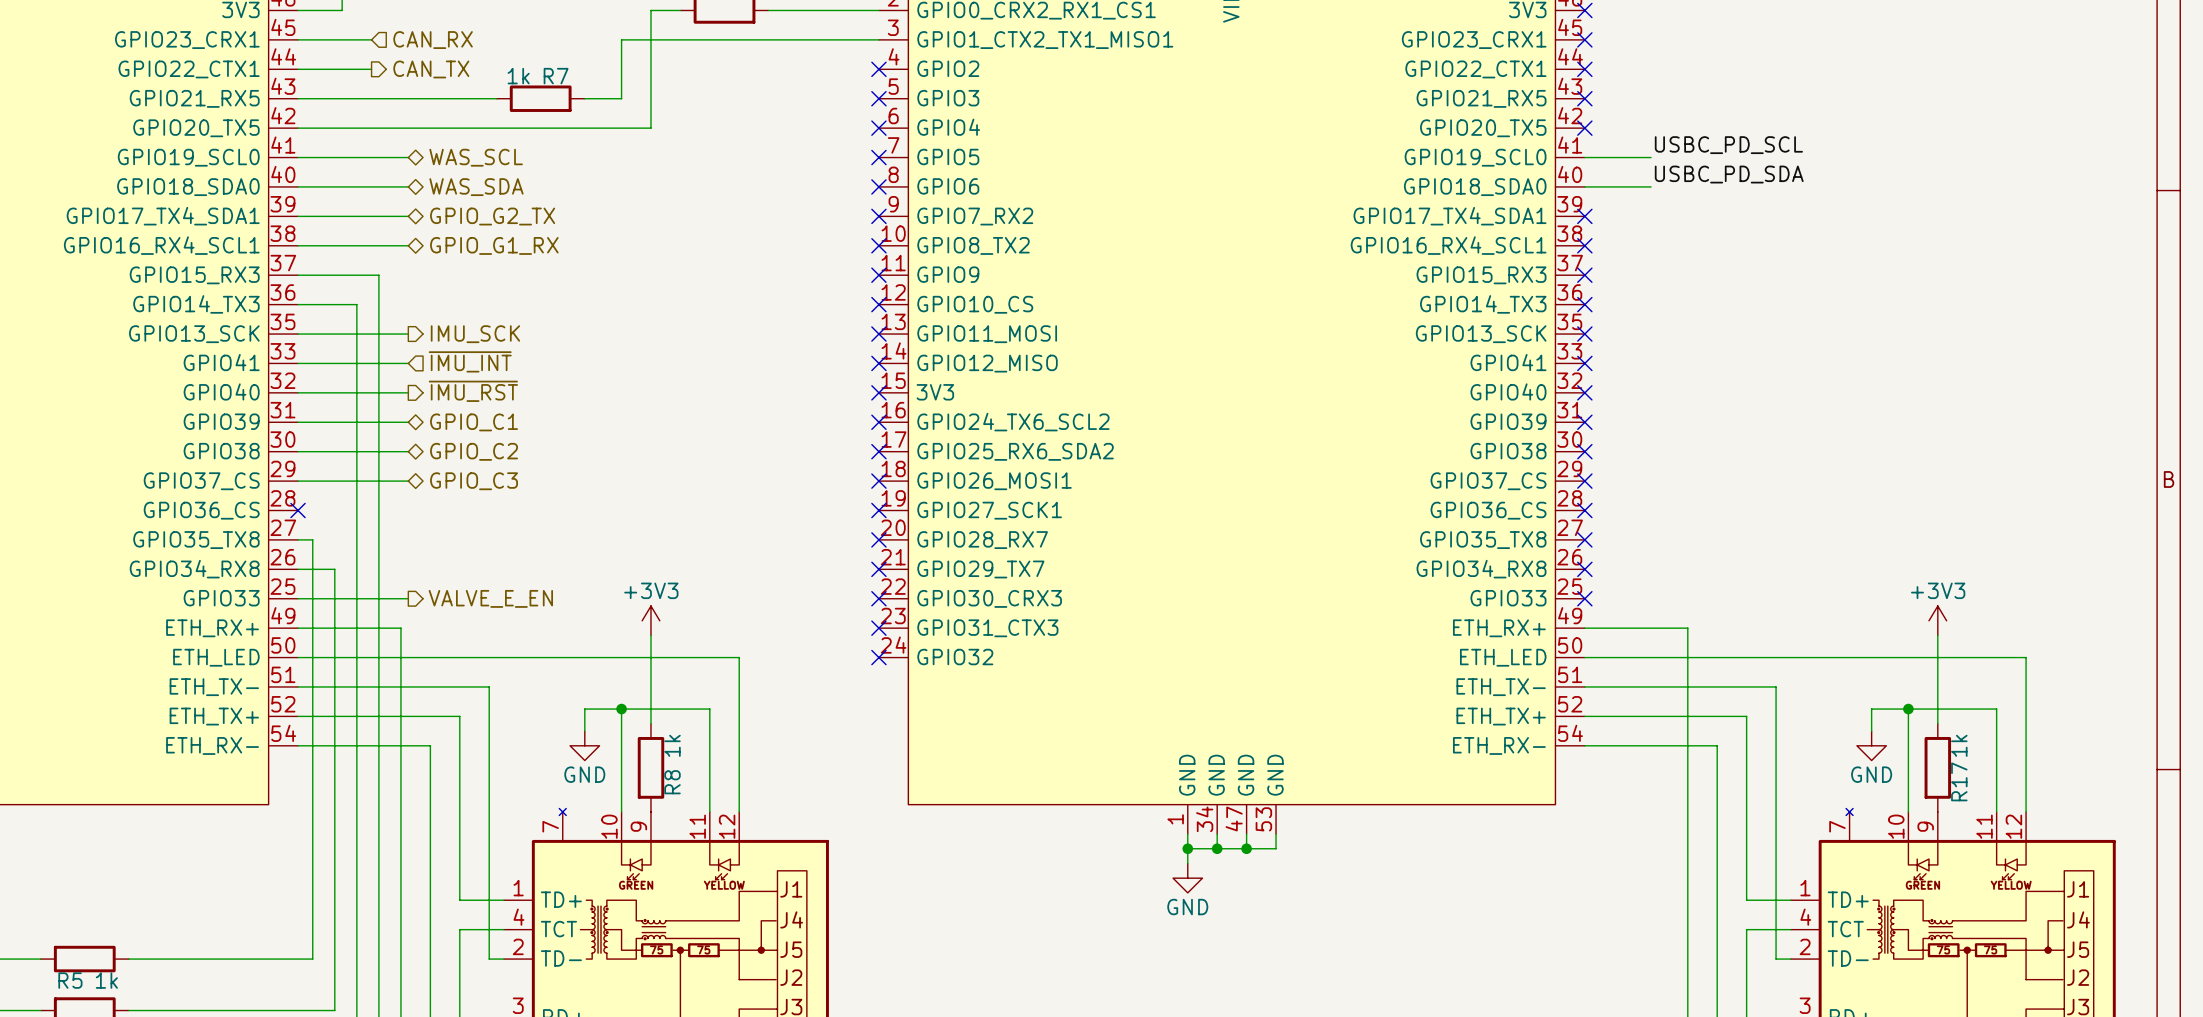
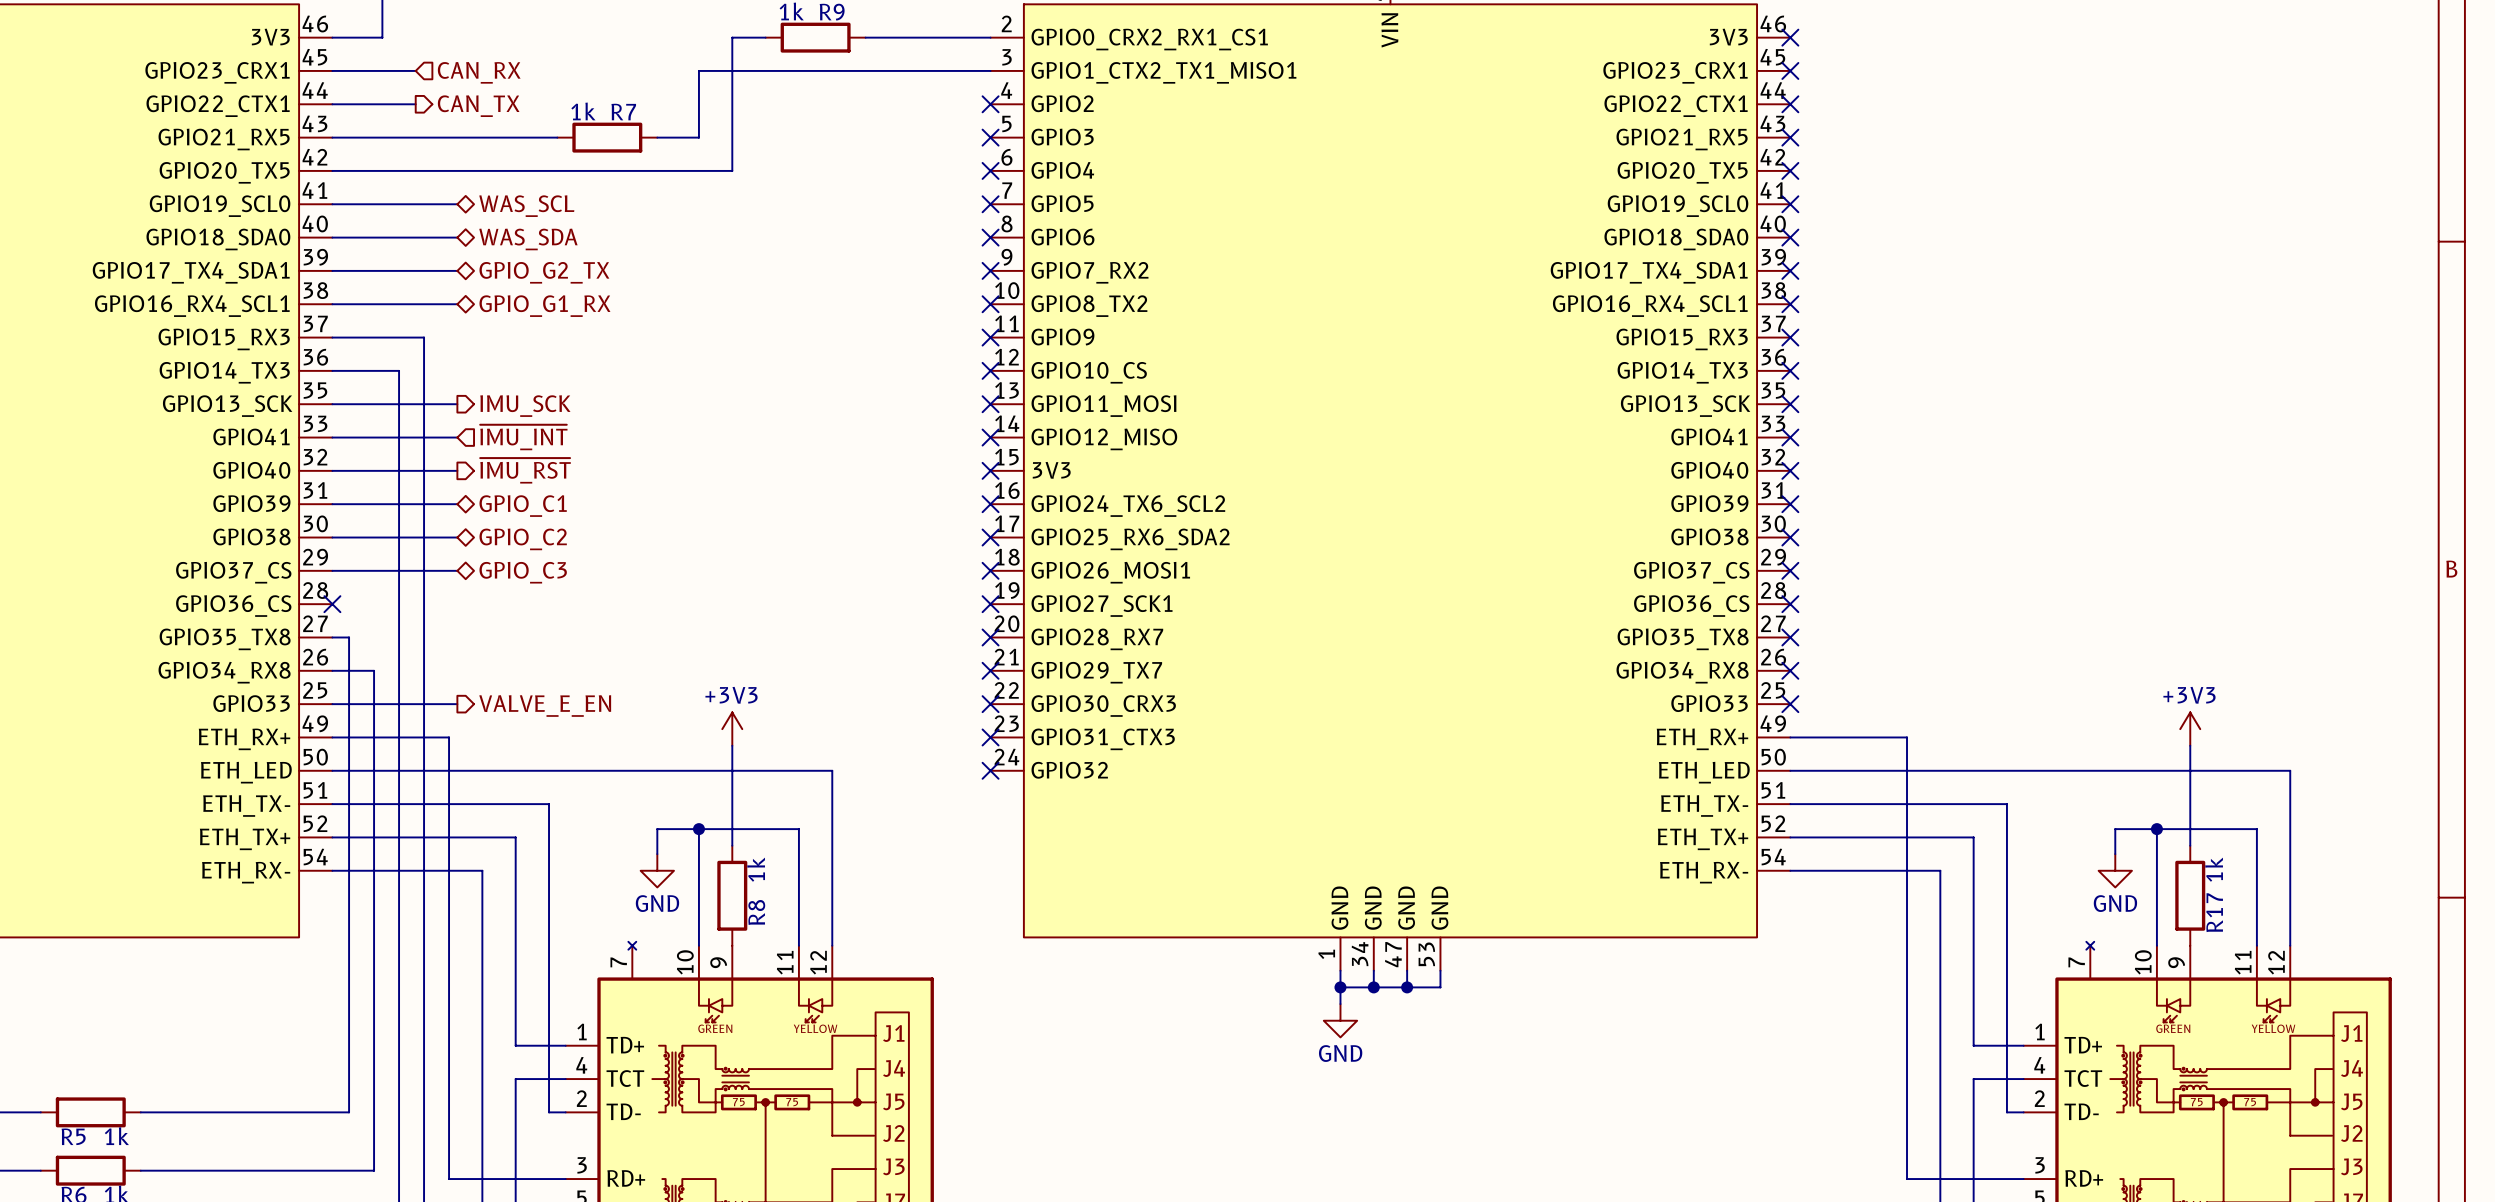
label: USBC_PD_SCL (1728, 145) -> none
wire: (1584, 157) (1651, 157) -> none
no-connect mark: none -> (1790, 204)
label: USBC_PD_SDA (1729, 174) -> none
wire: (1584, 186) (1651, 186) -> none
no-connect mark: none -> (1790, 237)

